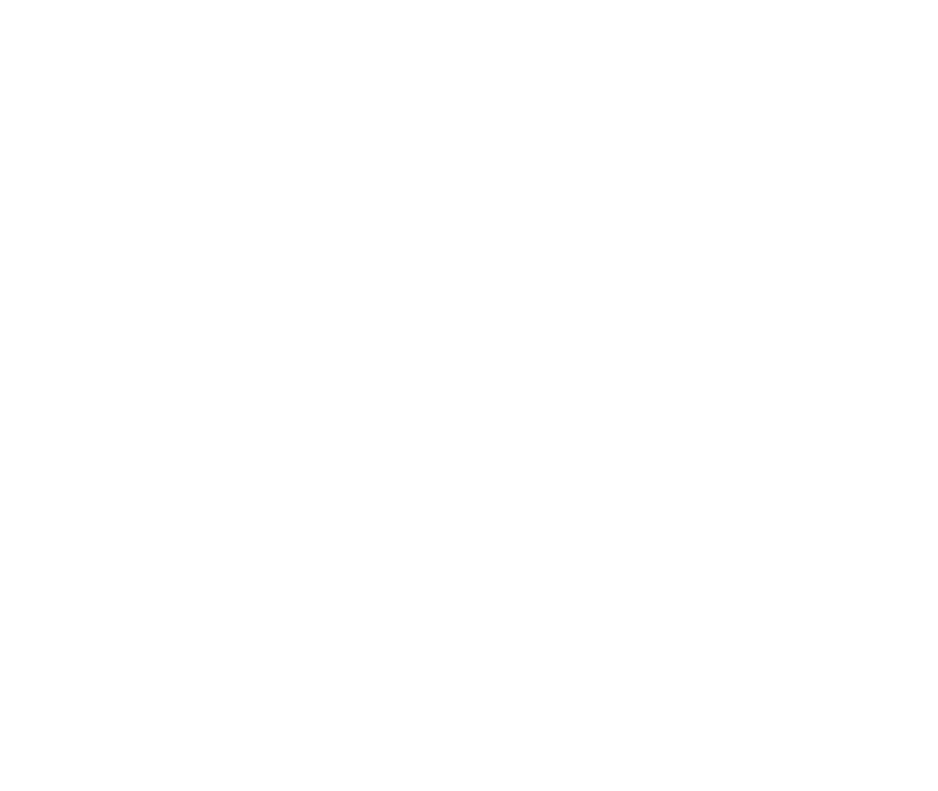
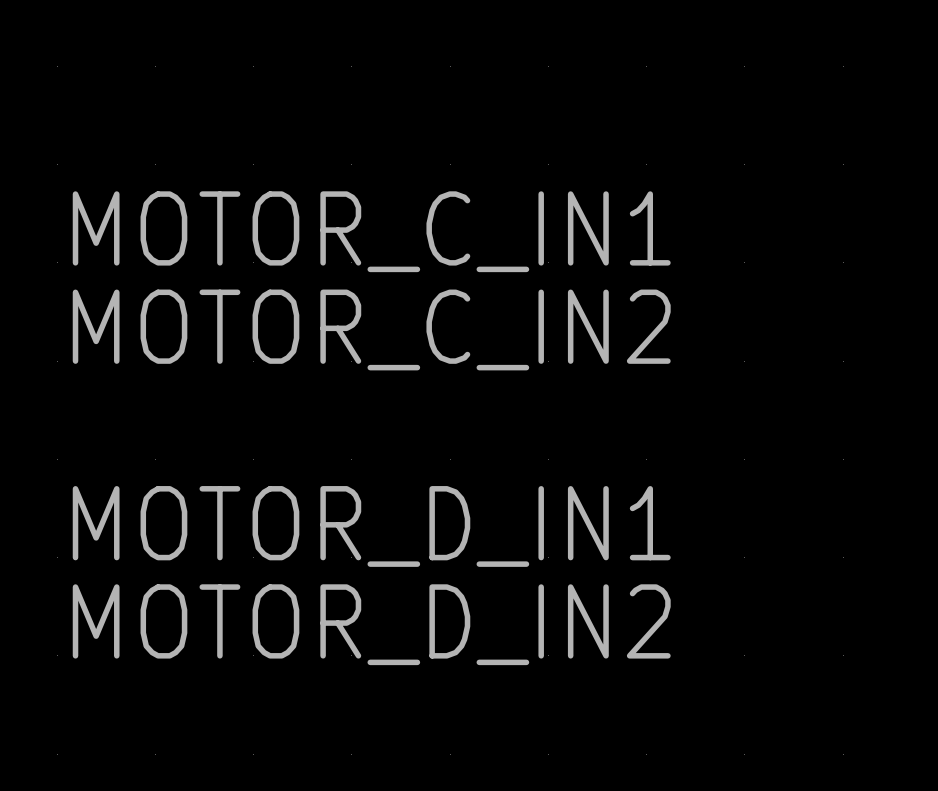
label: none -> MOTOR_C_IN1 (371, 231)
label: none -> MOTOR_C_IN2 (371, 329)
label: none -> MOTOR_D_IN1 (371, 526)
label: none -> MOTOR_D_IN2 (371, 624)

